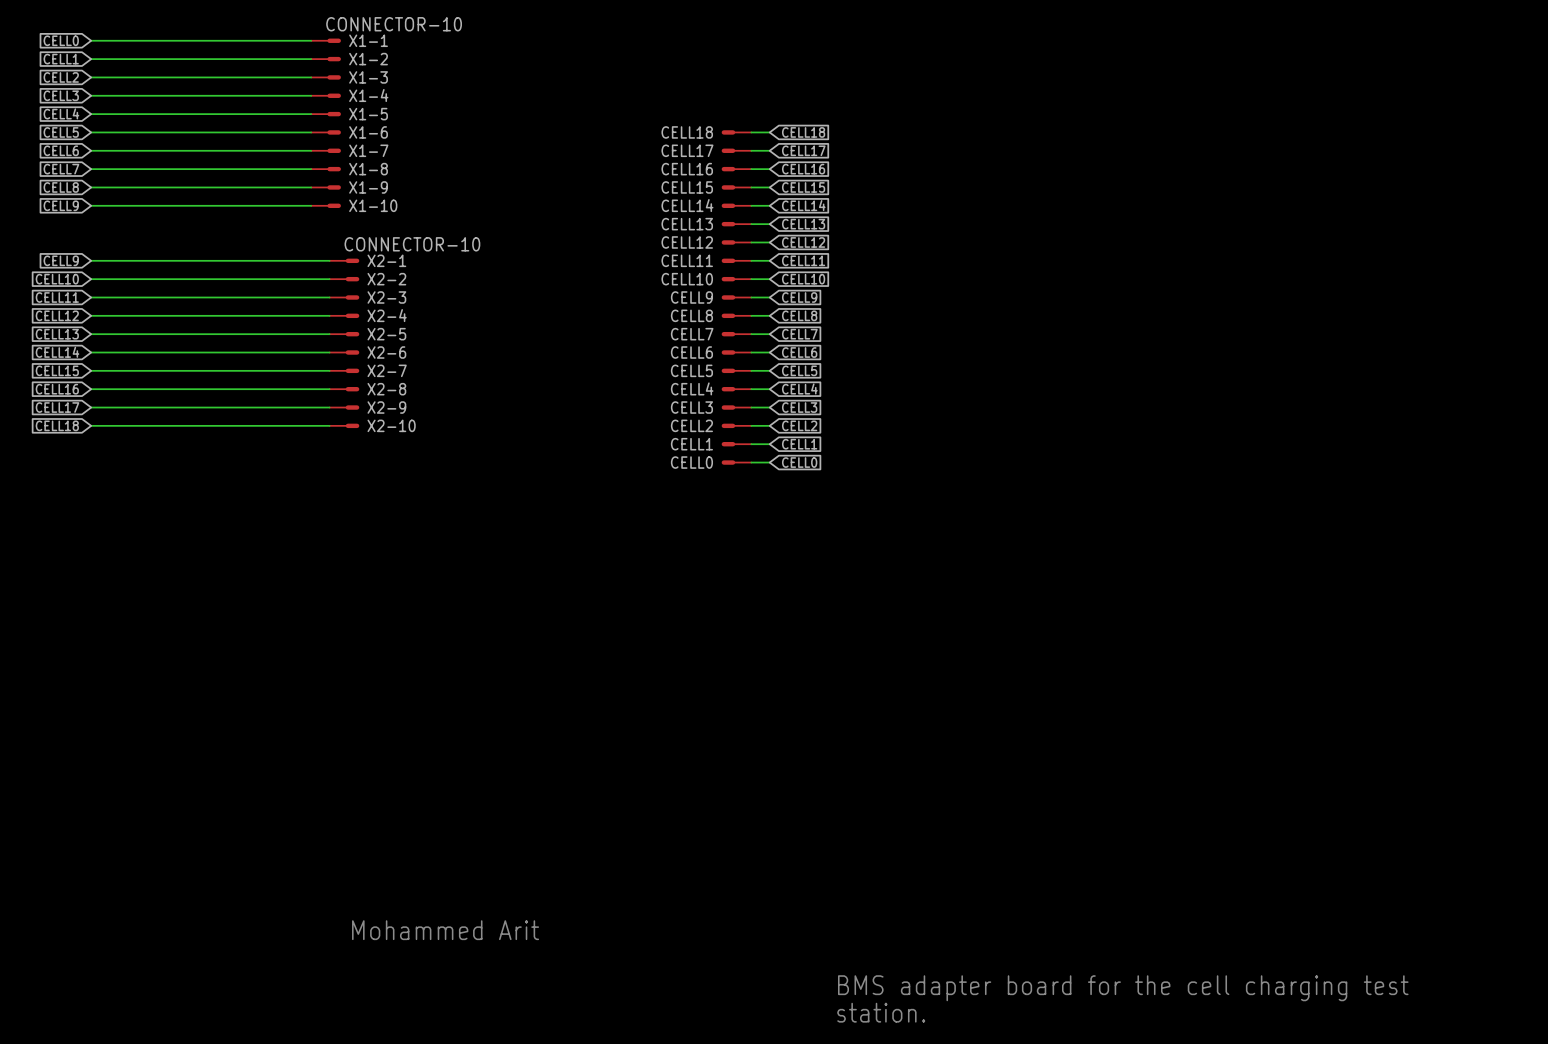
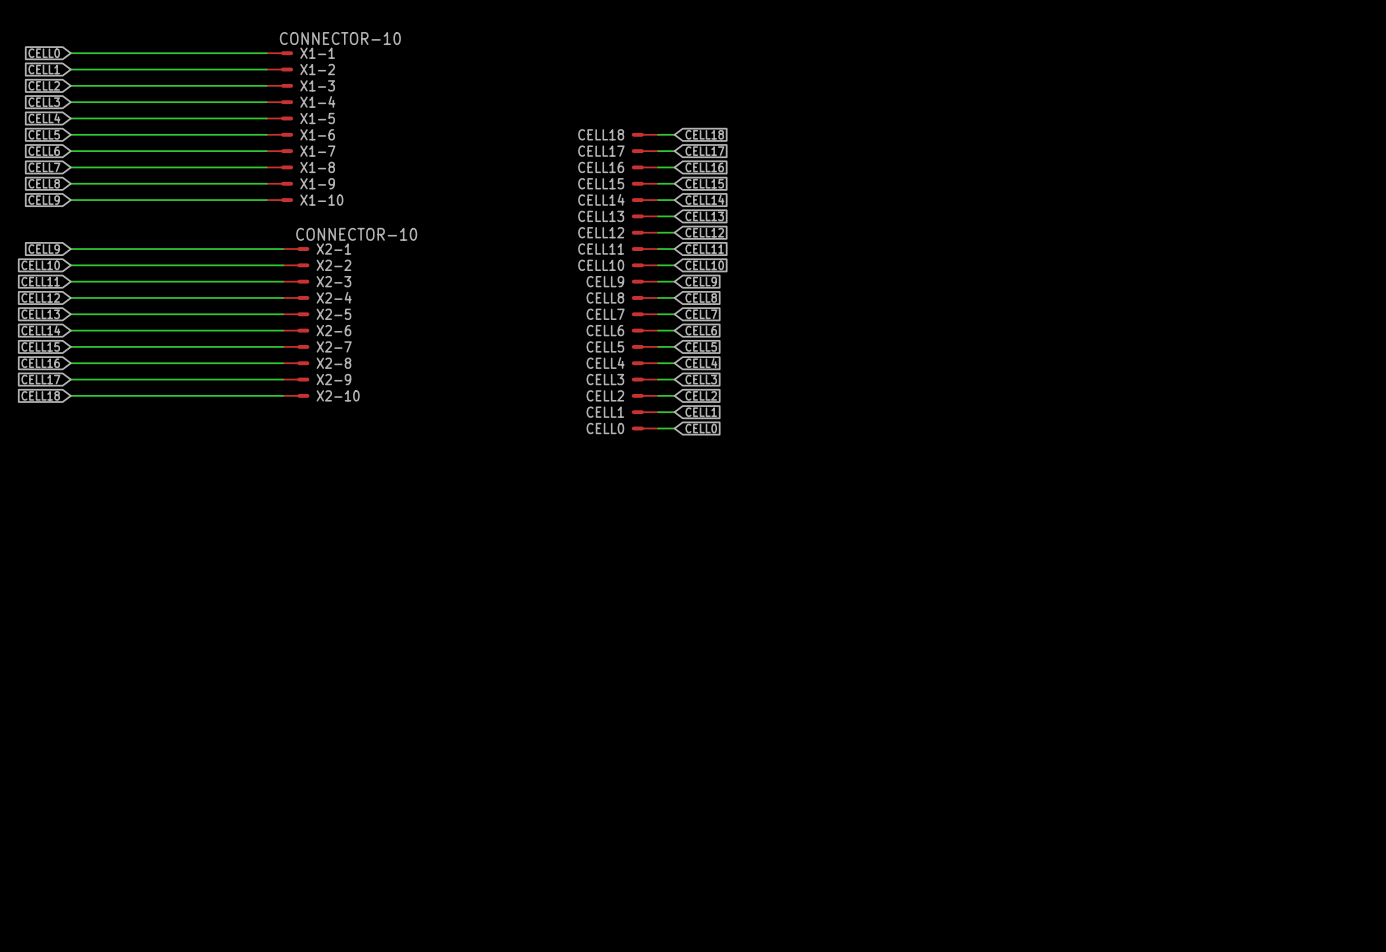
text: Mohammed Arit (445, 930) -> none
text: BMS adapter board for the cell charging test (1123, 988) -> none
text: station. (881, 1012) -> none

